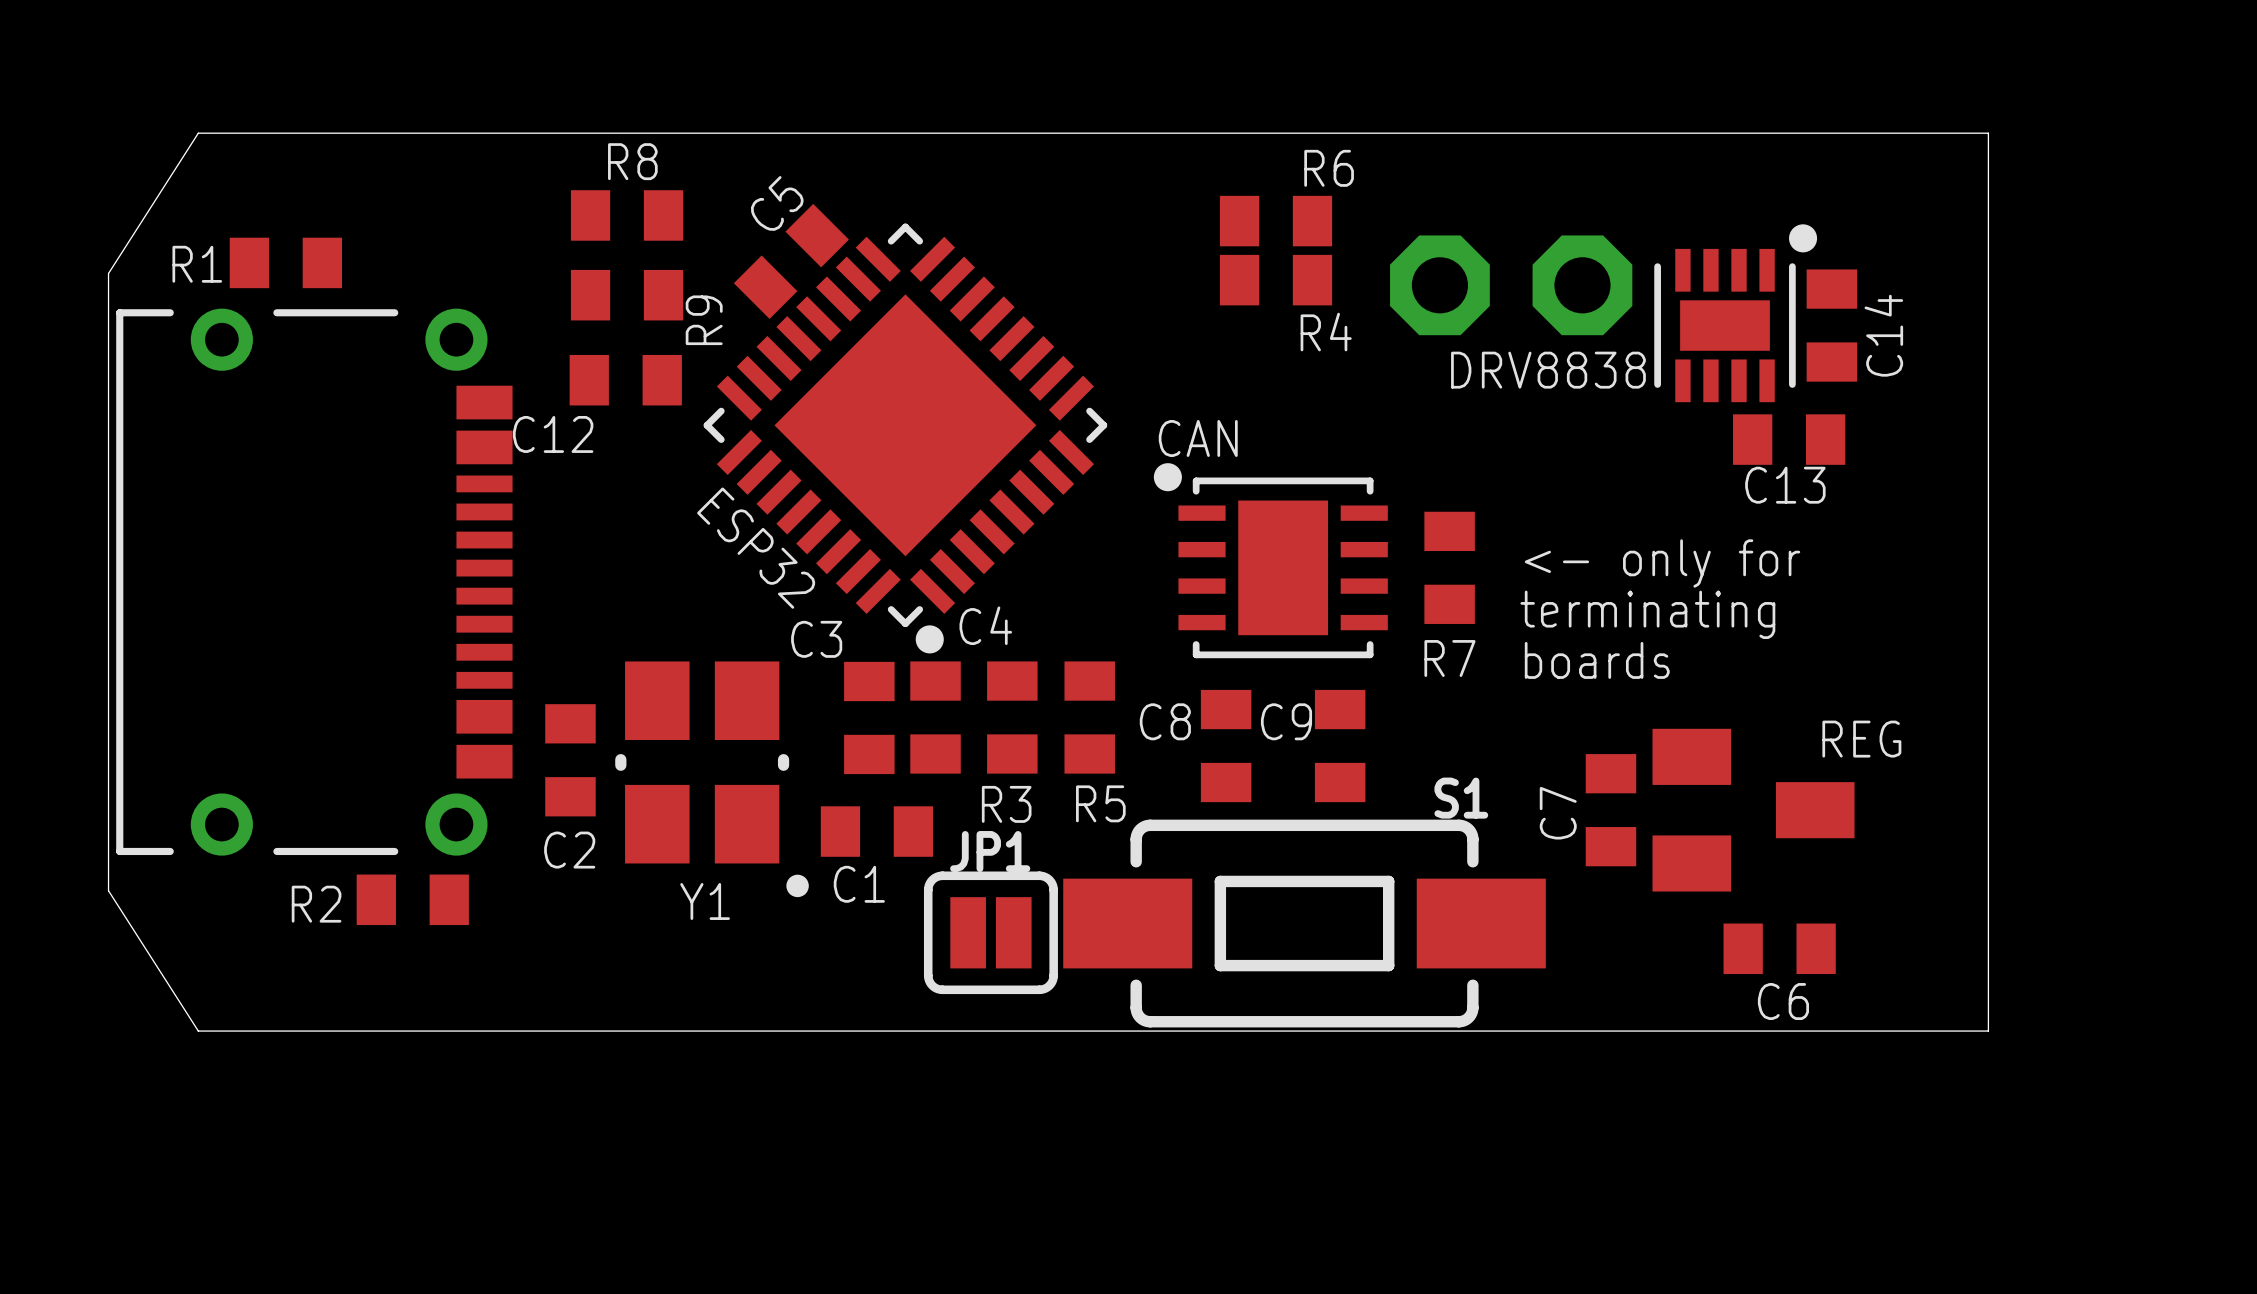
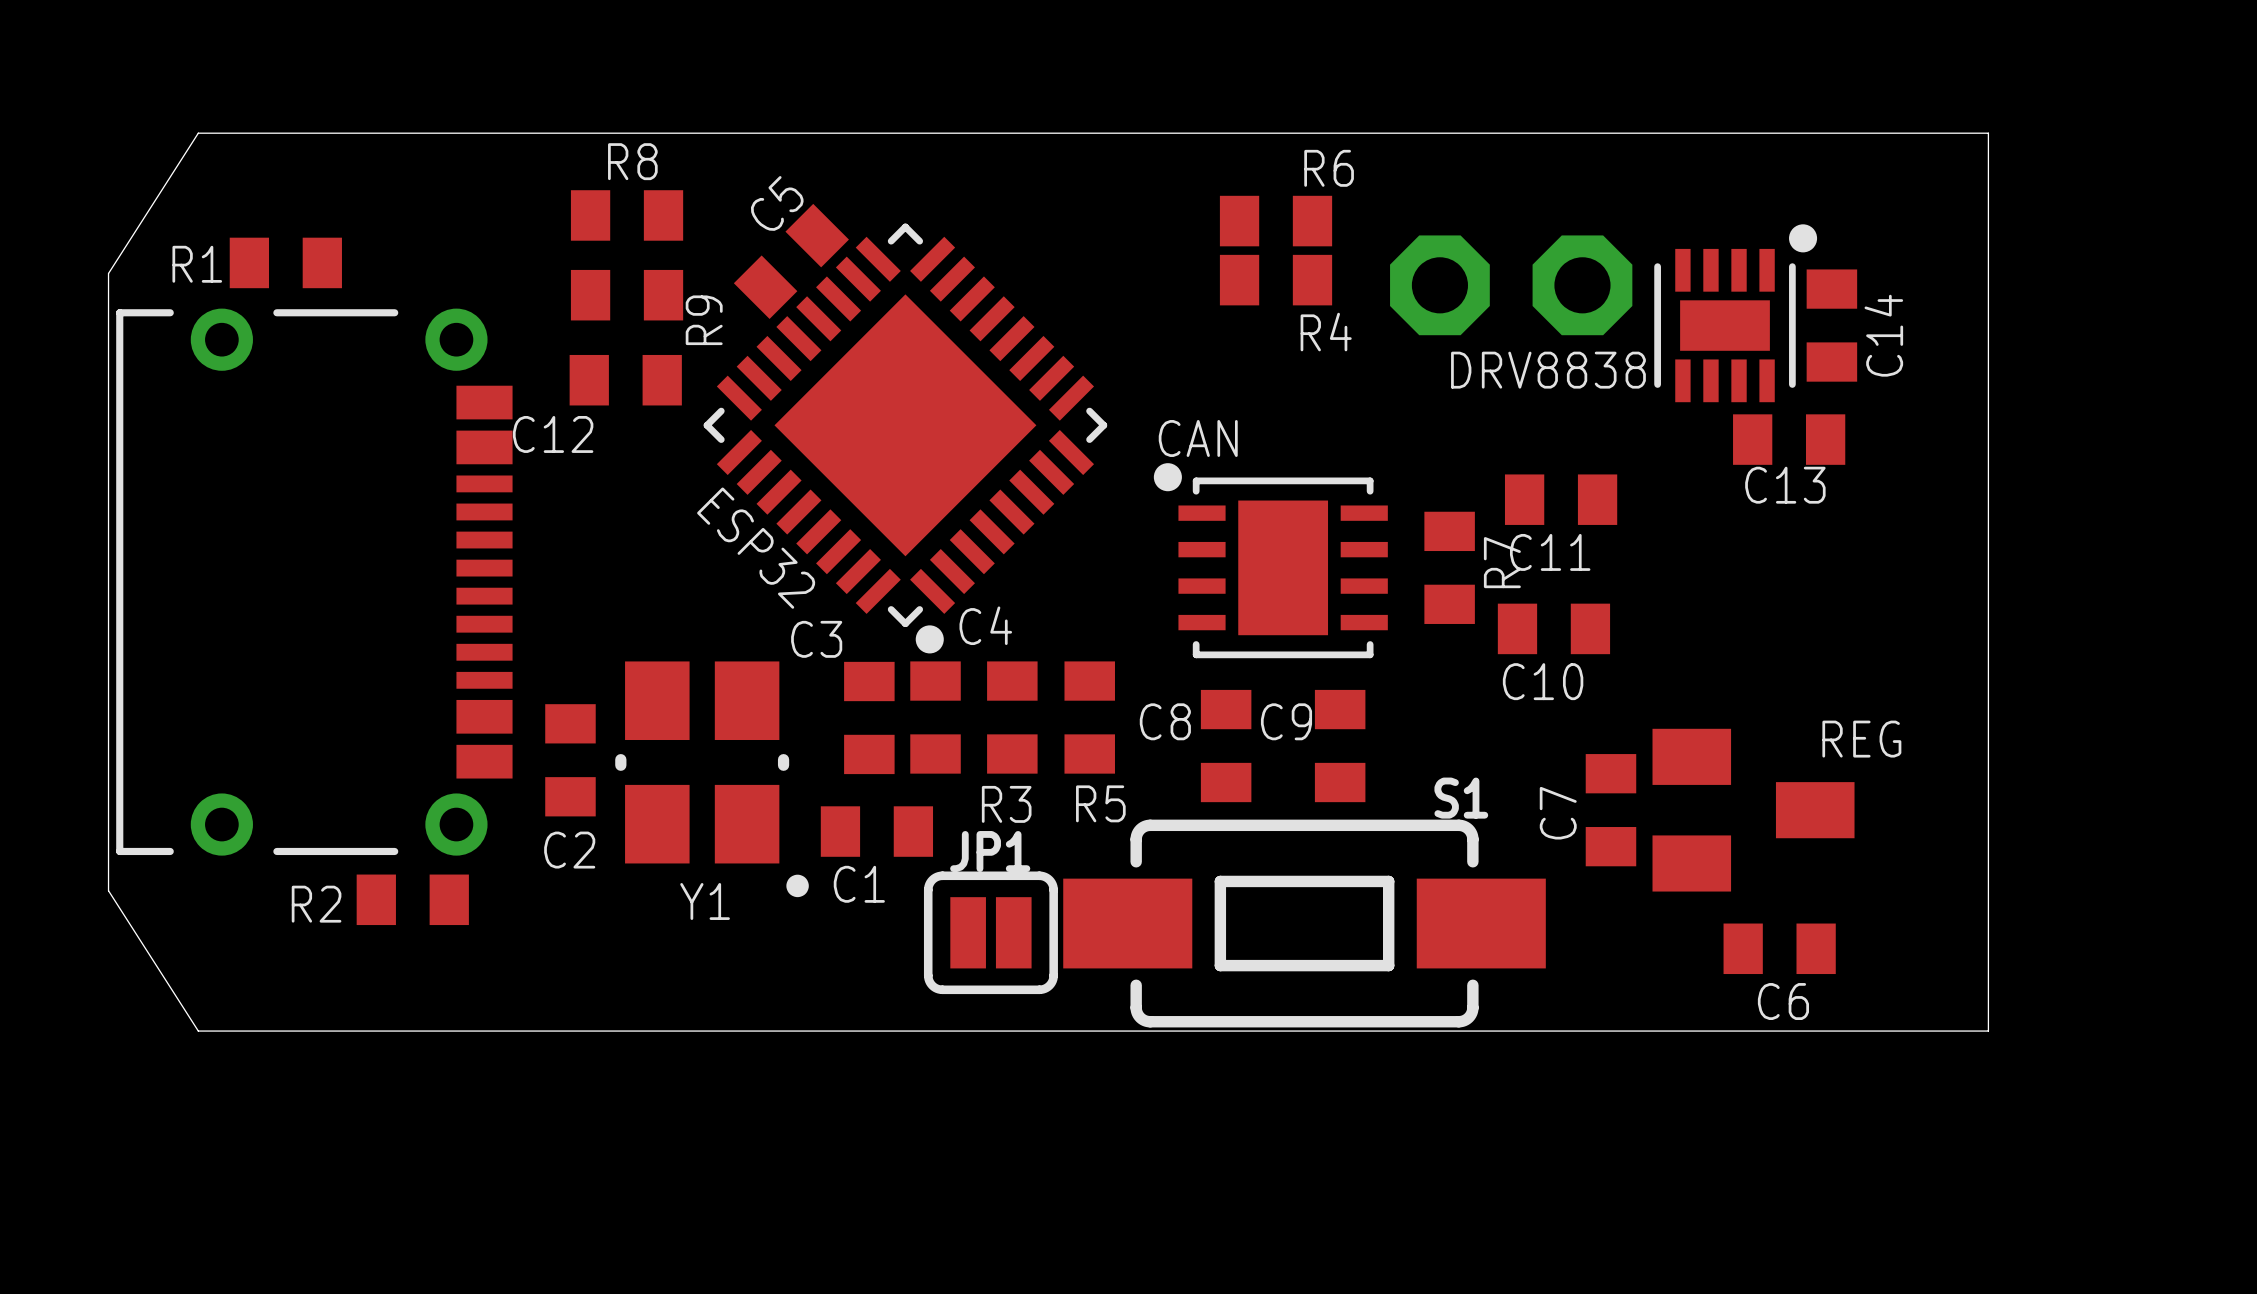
C11: none -> (1561, 499)
text: <- only for (1662, 563) -> none
text: terminating (1647, 614) -> none
C10: none -> (1553, 628)
R7 name rotation: 0° (1449, 658) -> 90° counterclockwise (1502, 562)
R7 name position: R7 (1449, 658) -> R7 (1502, 562)
text: boards (1597, 660) -> none

